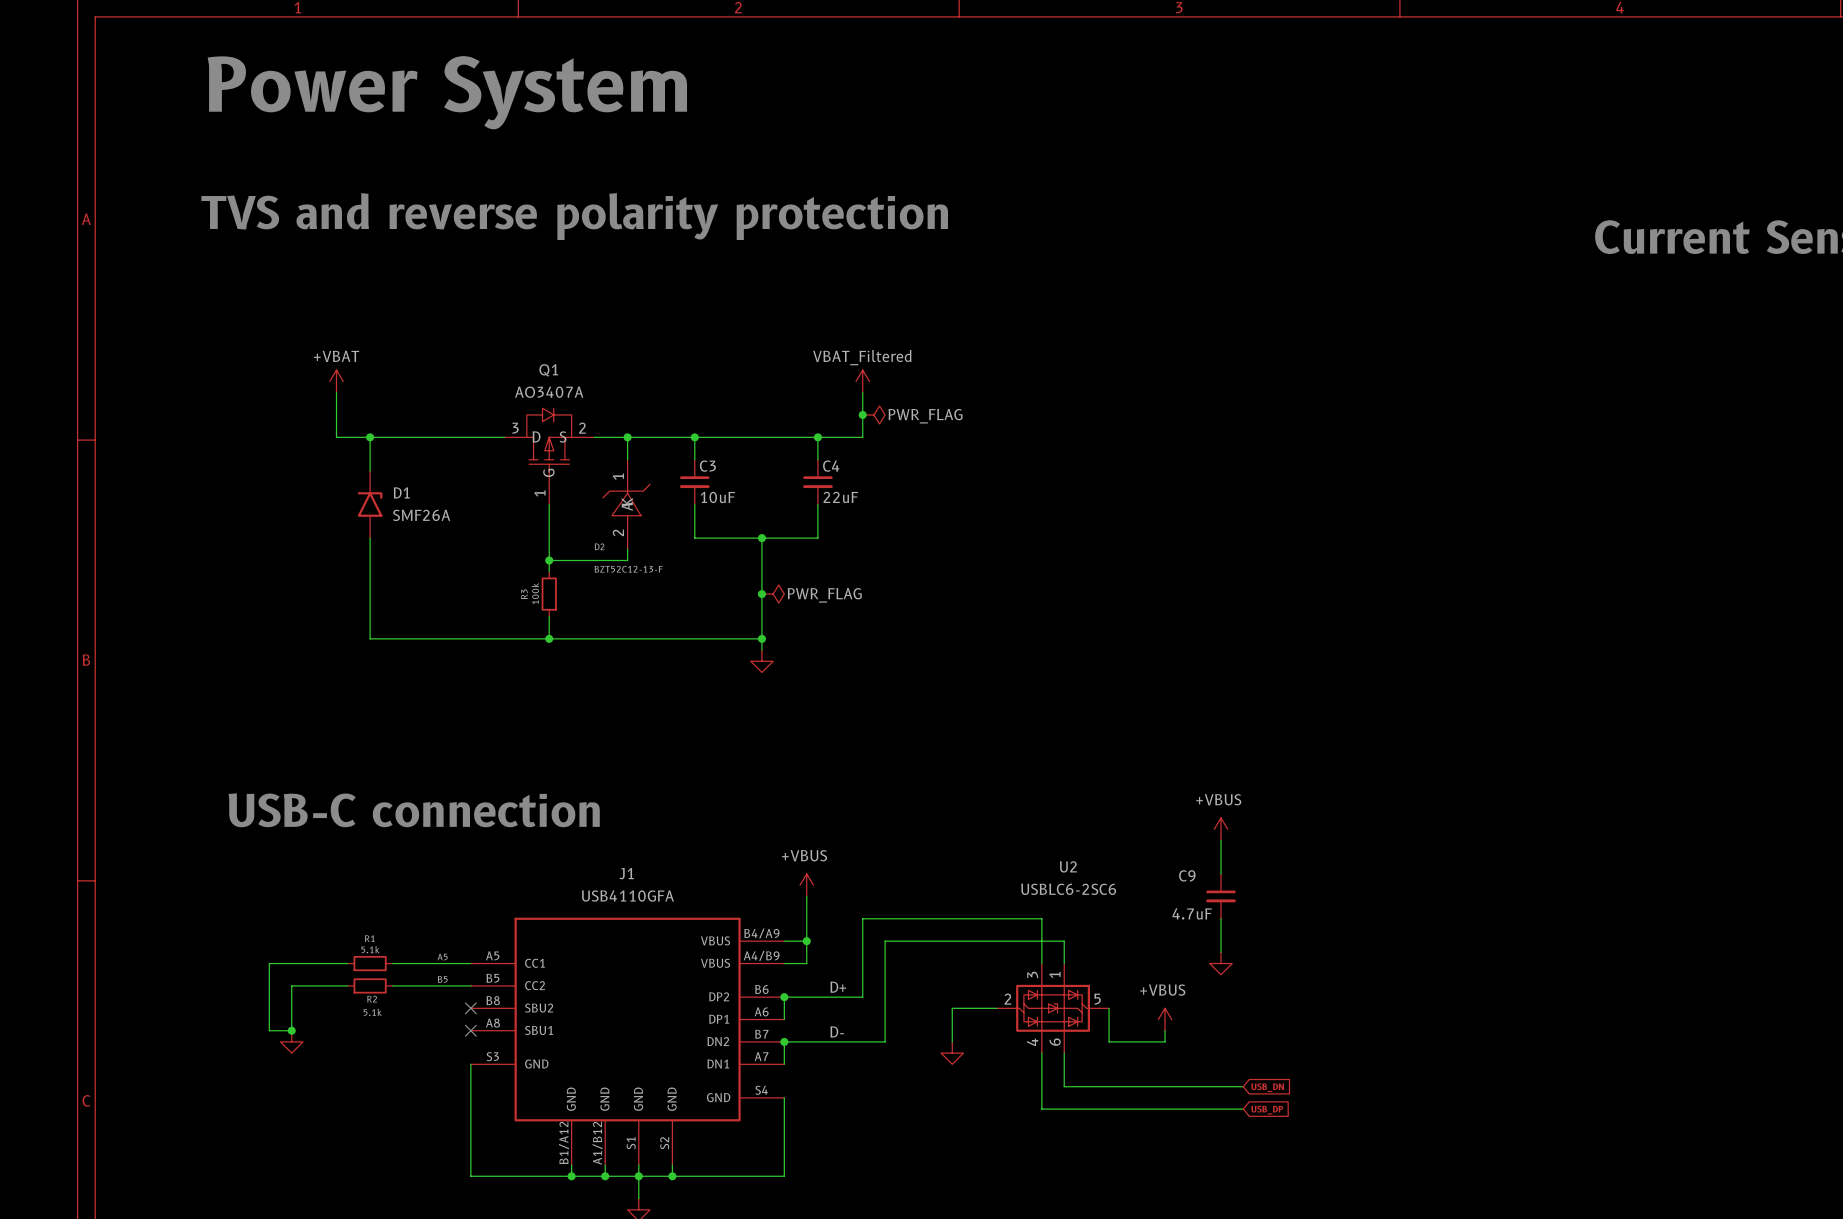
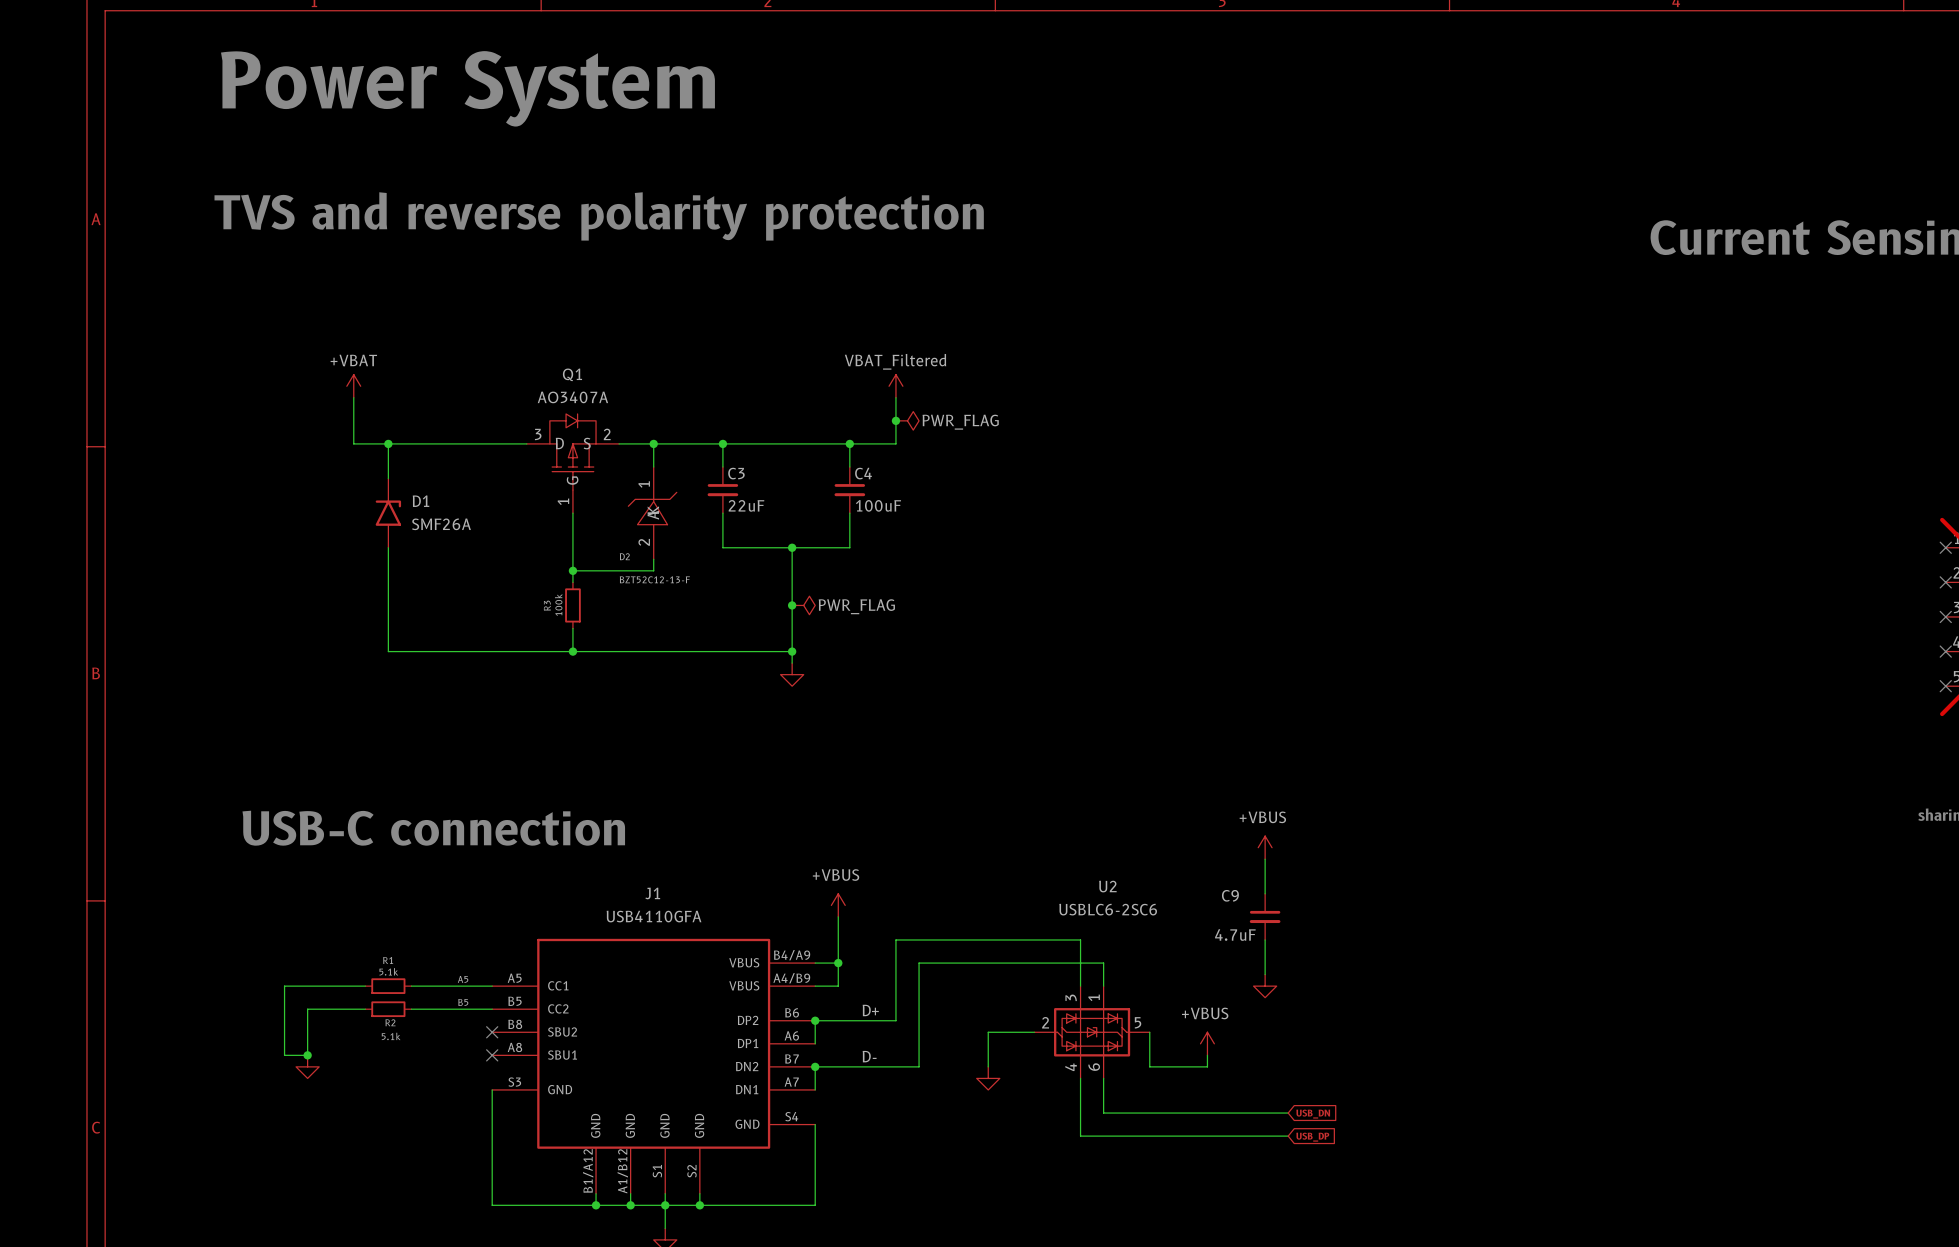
C3 value: 10uF (717, 497) -> 22uF (746, 505)
C4 value: 22uF (840, 497) -> 100uF (878, 505)

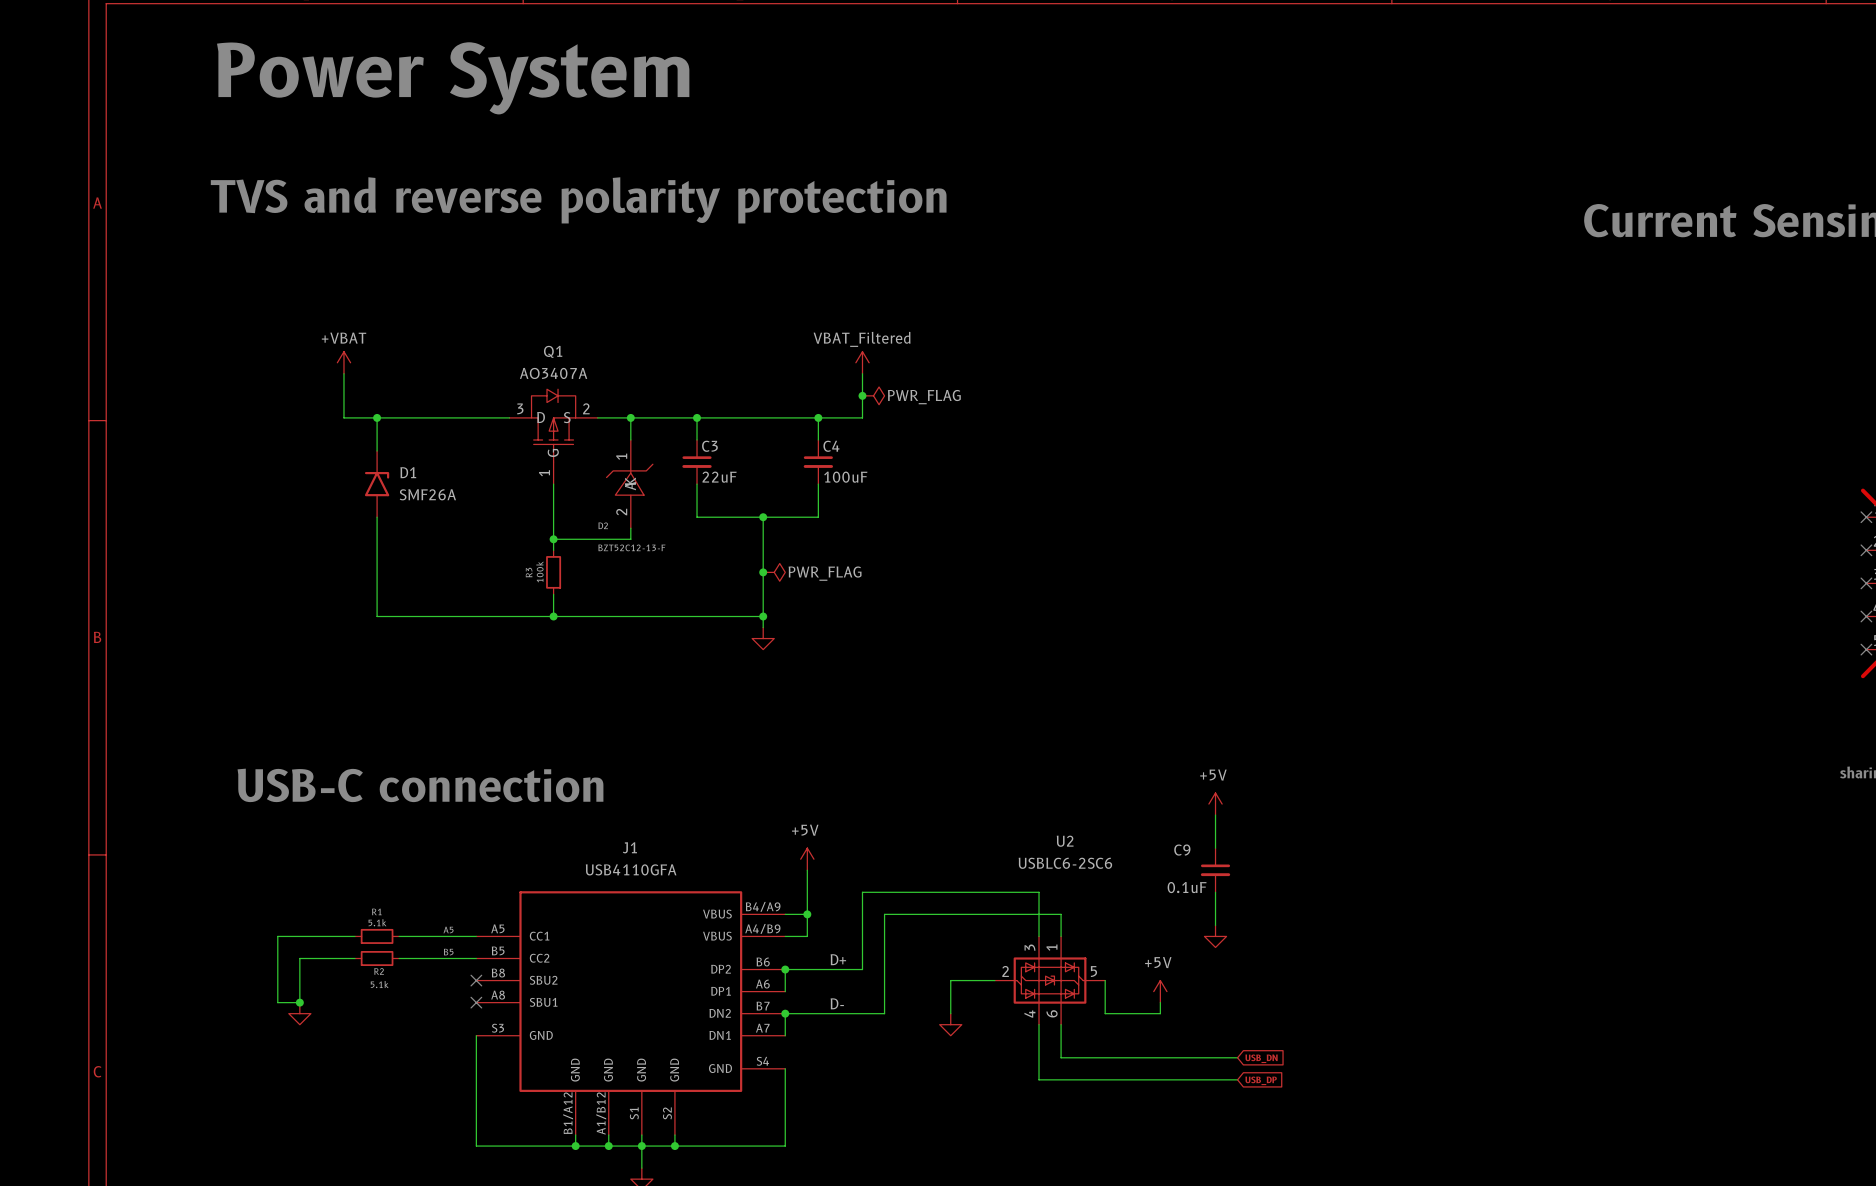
power symbol: +VBUS (1265, 847) -> +5V (1215, 804)
power symbol: +VBUS (838, 905) -> +5V (807, 859)
C9 value: 4.7uF (1235, 935) -> 0.1uF (1187, 887)
power symbol: +VBUS (1207, 1043) -> +5V (1160, 991)

